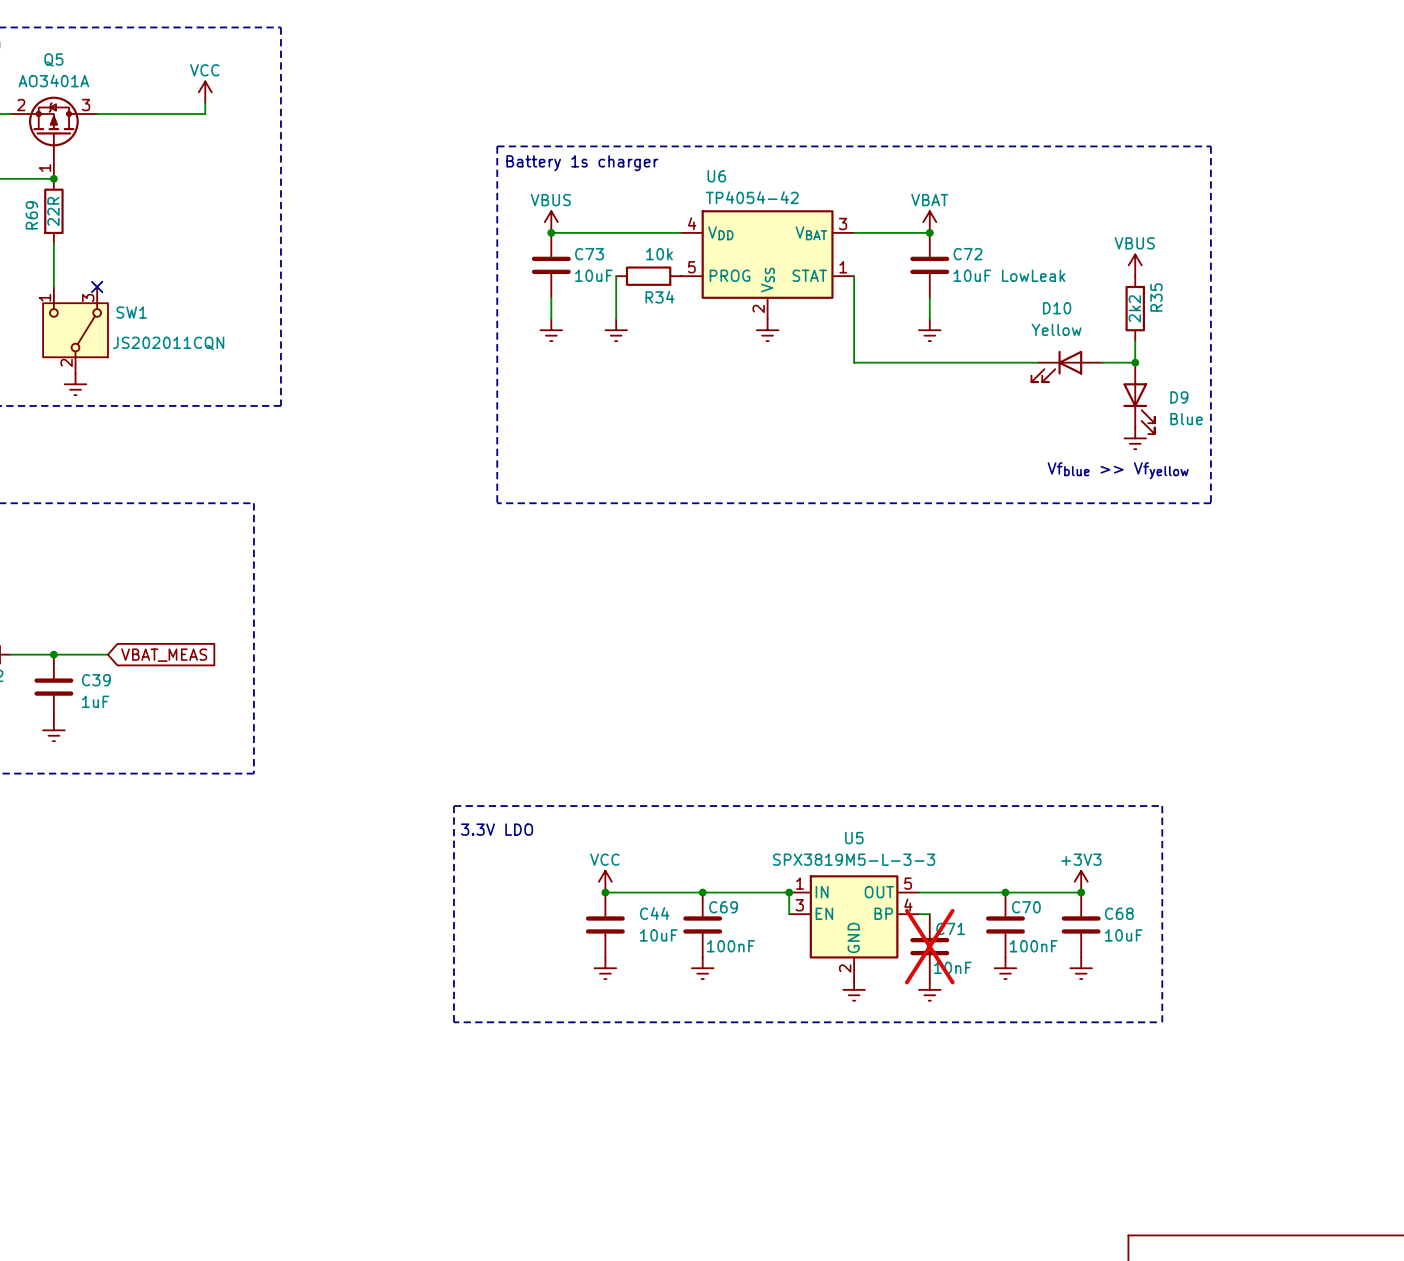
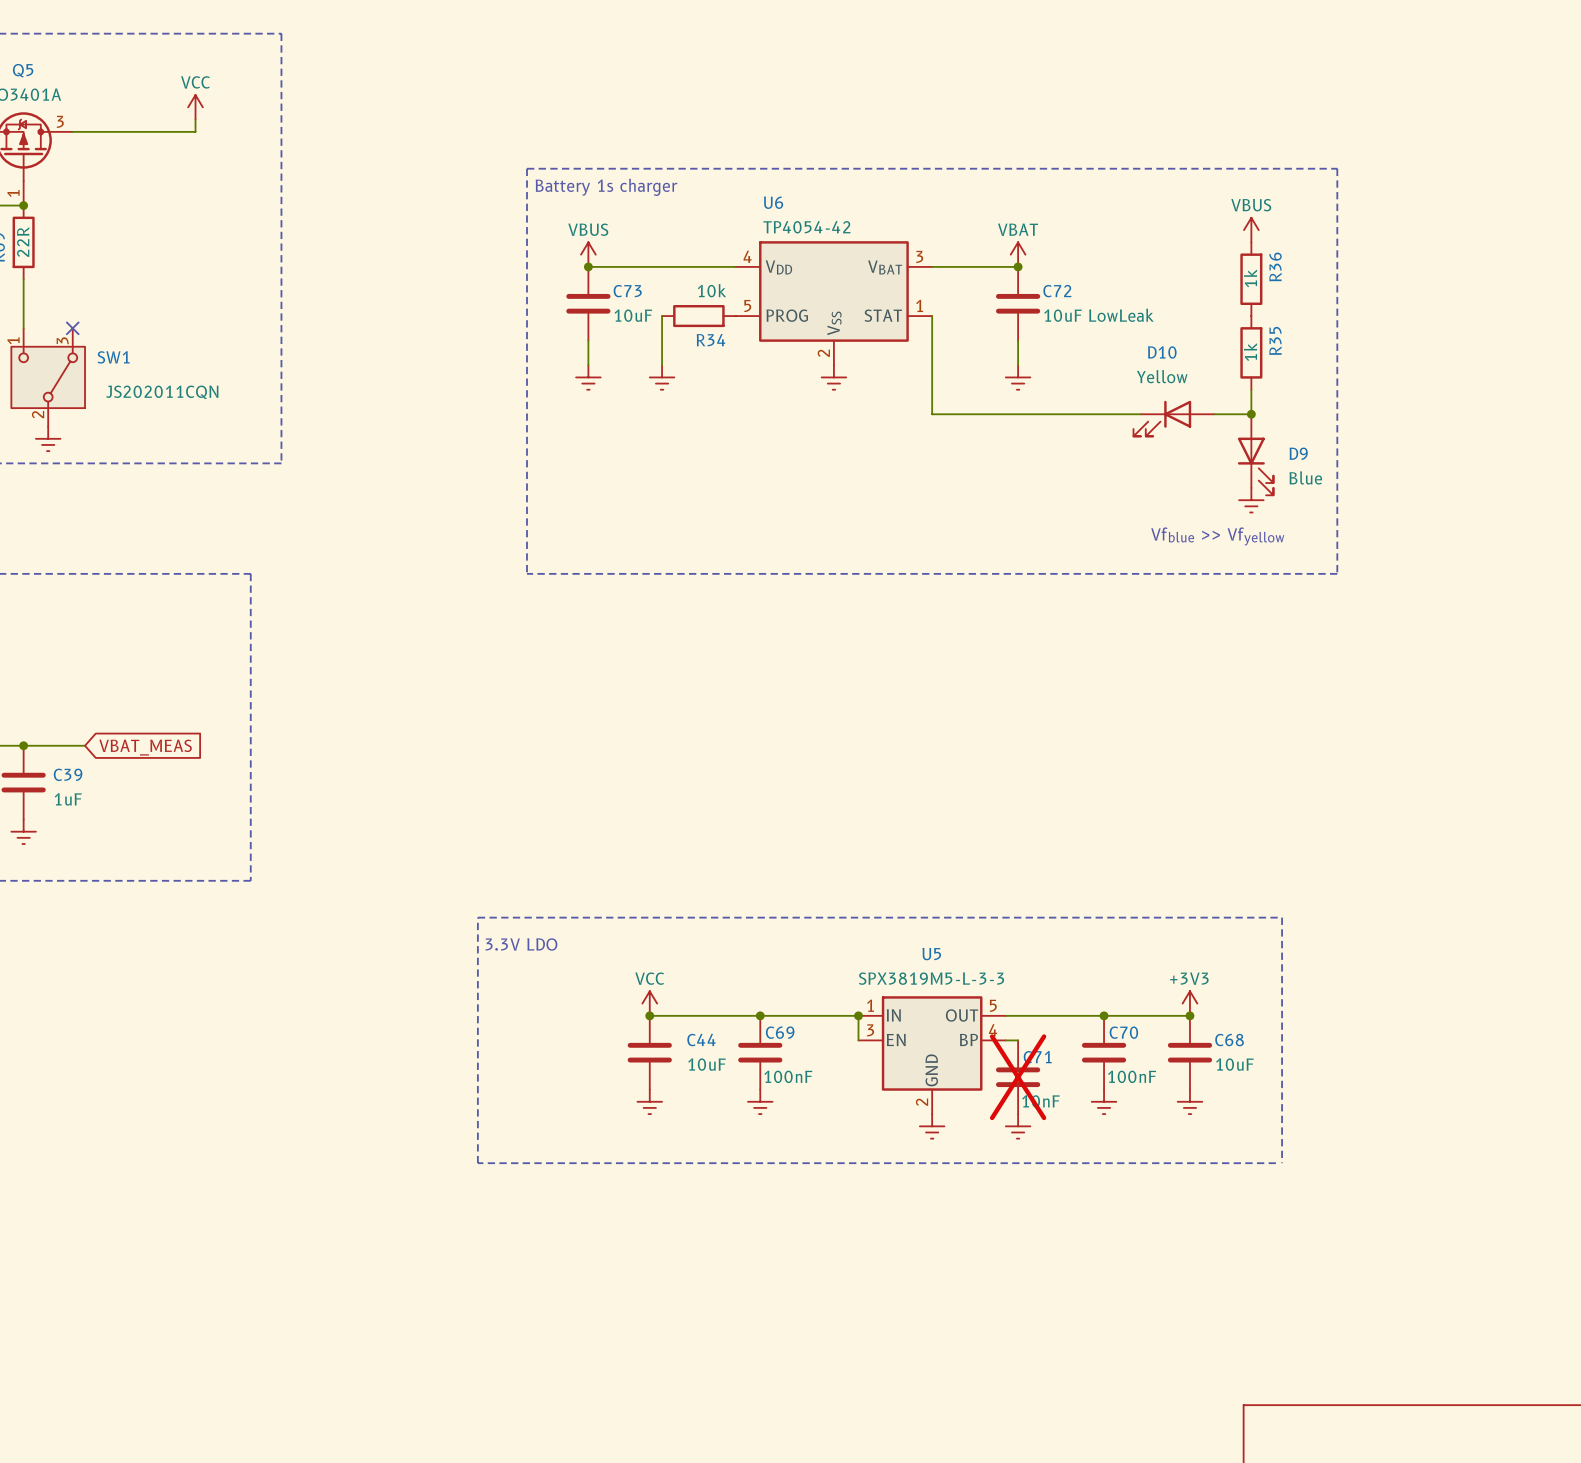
R36: none -> 1k (1251, 279)
power symbol position: VBUS (1135, 265) -> VBUS (1251, 230)
R35 value: 2k2 (1134, 308) -> 1k (1250, 352)

